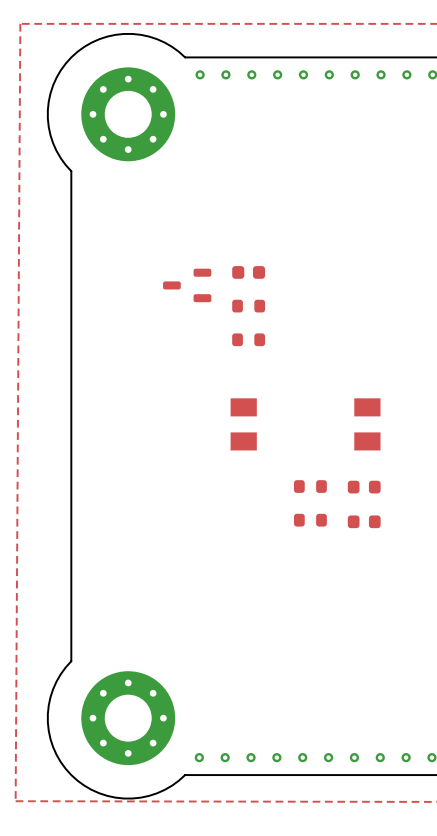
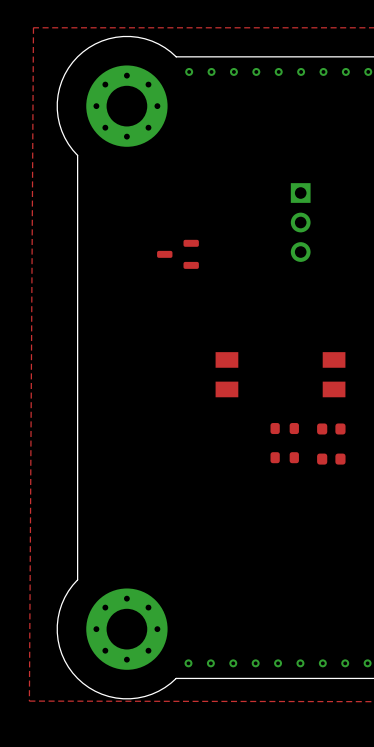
part: none -> (300, 222)
part: (248, 272) -> none
part: (248, 306) -> none
part: (248, 339) -> none

